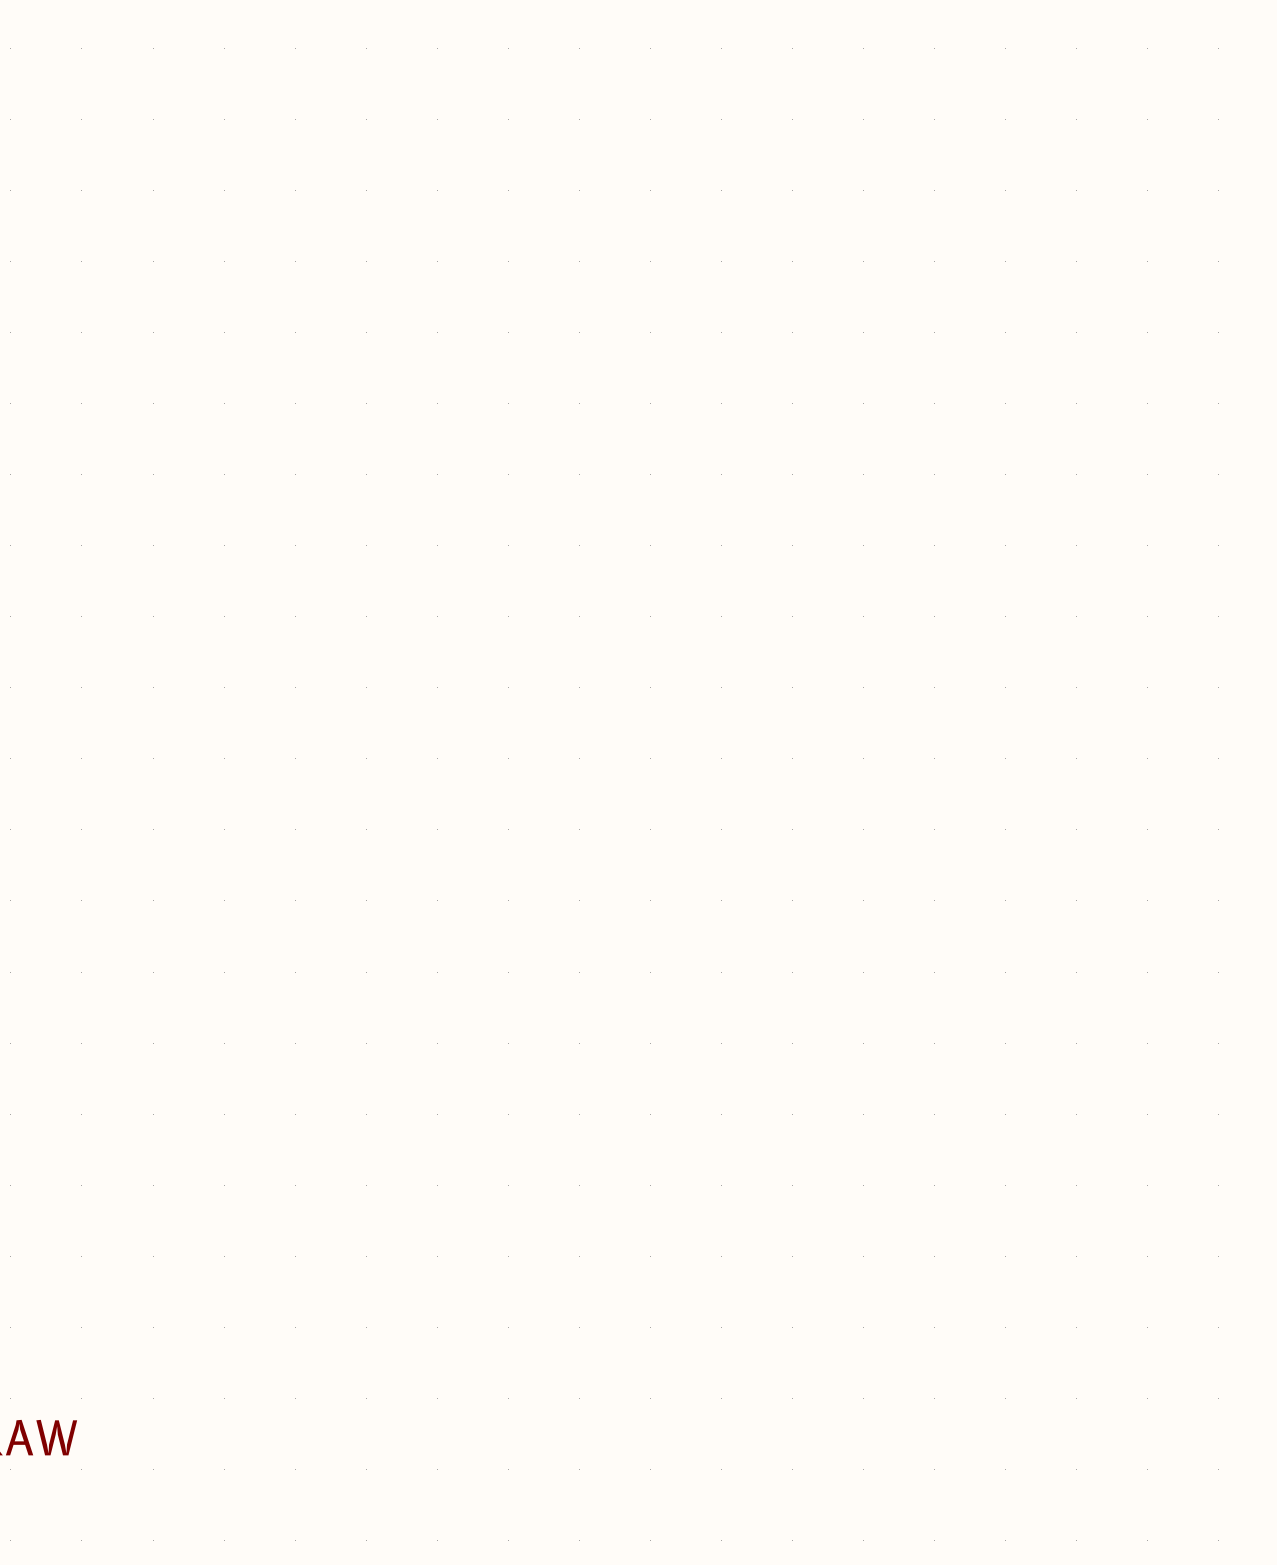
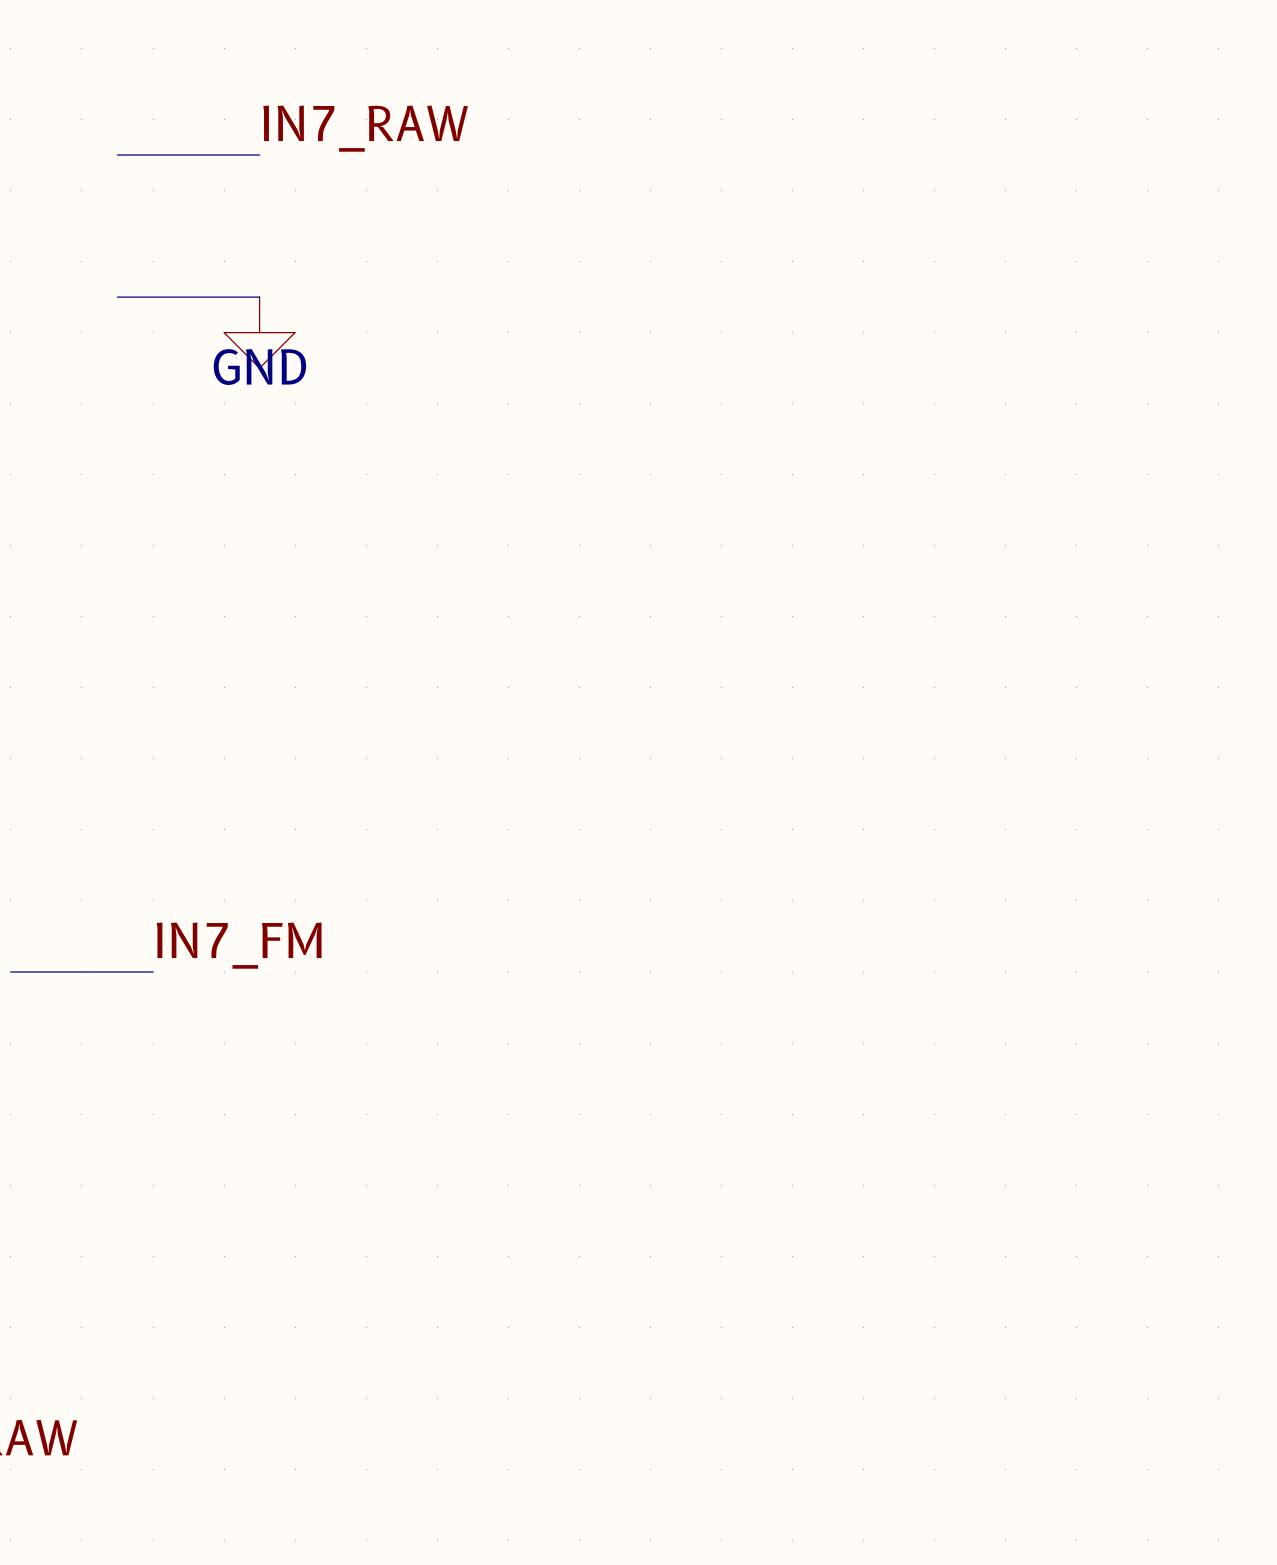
label: none -> IN7_RAW (365, 128)
wire: none -> (117, 155) (259, 155)
wire: none -> (117, 297) (259, 297)
power symbol: none -> GND (259, 332)
label: none -> IN7_FM (239, 945)
wire: none -> (10, 972) (153, 972)

